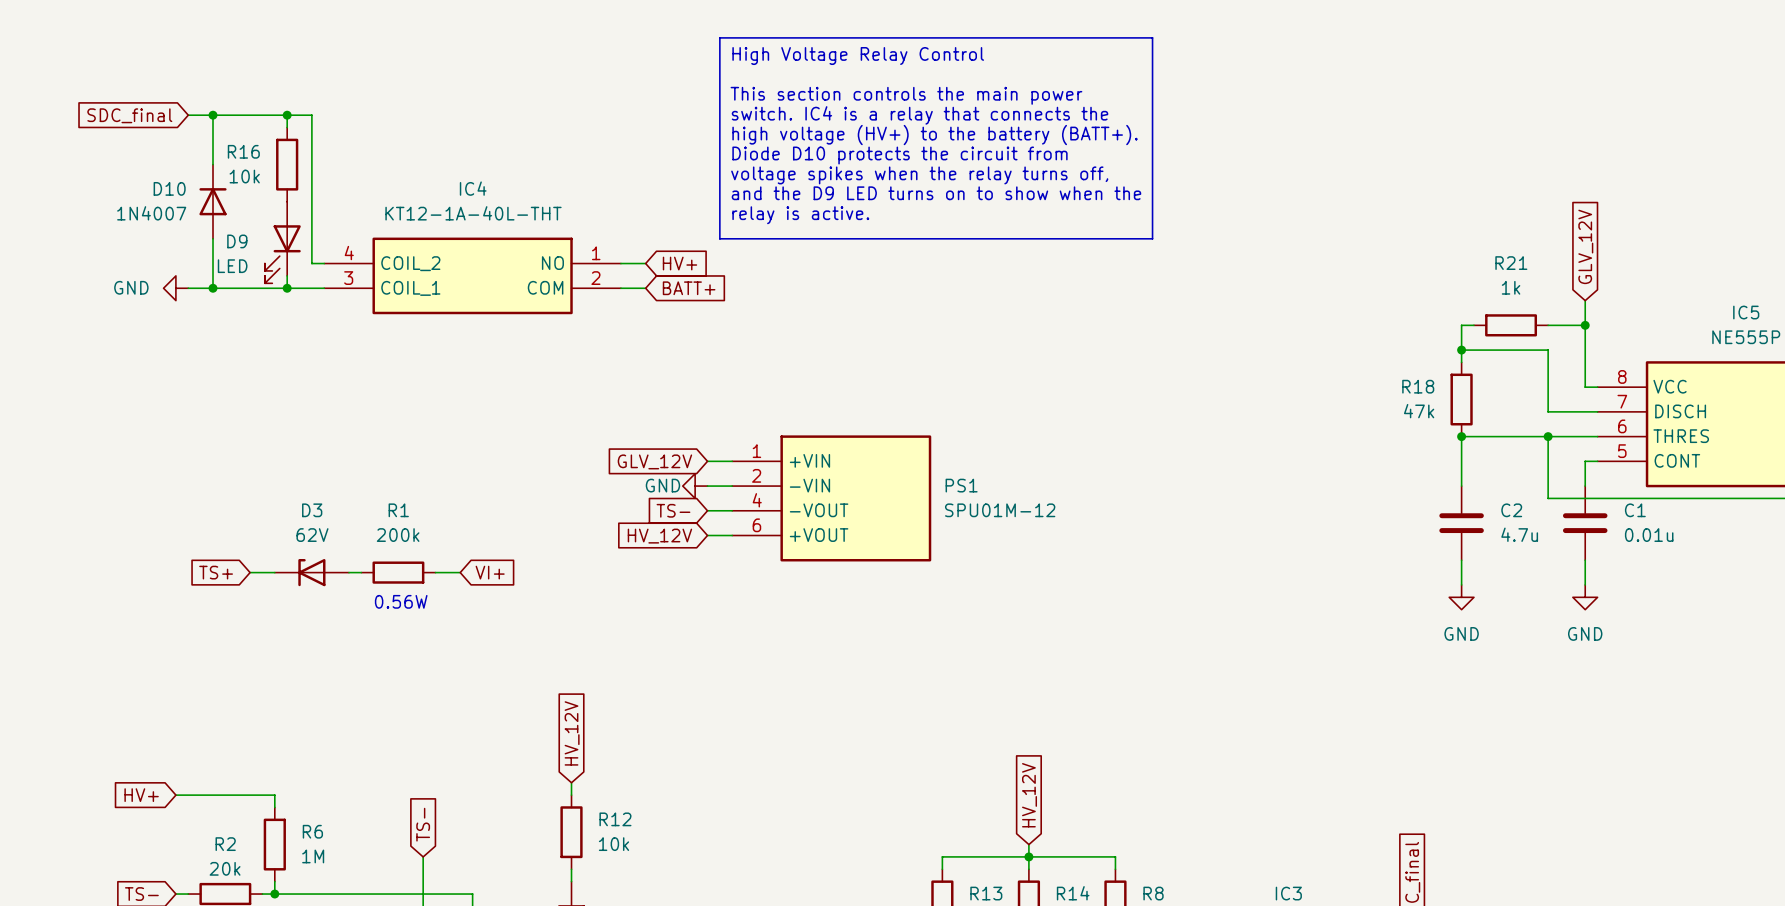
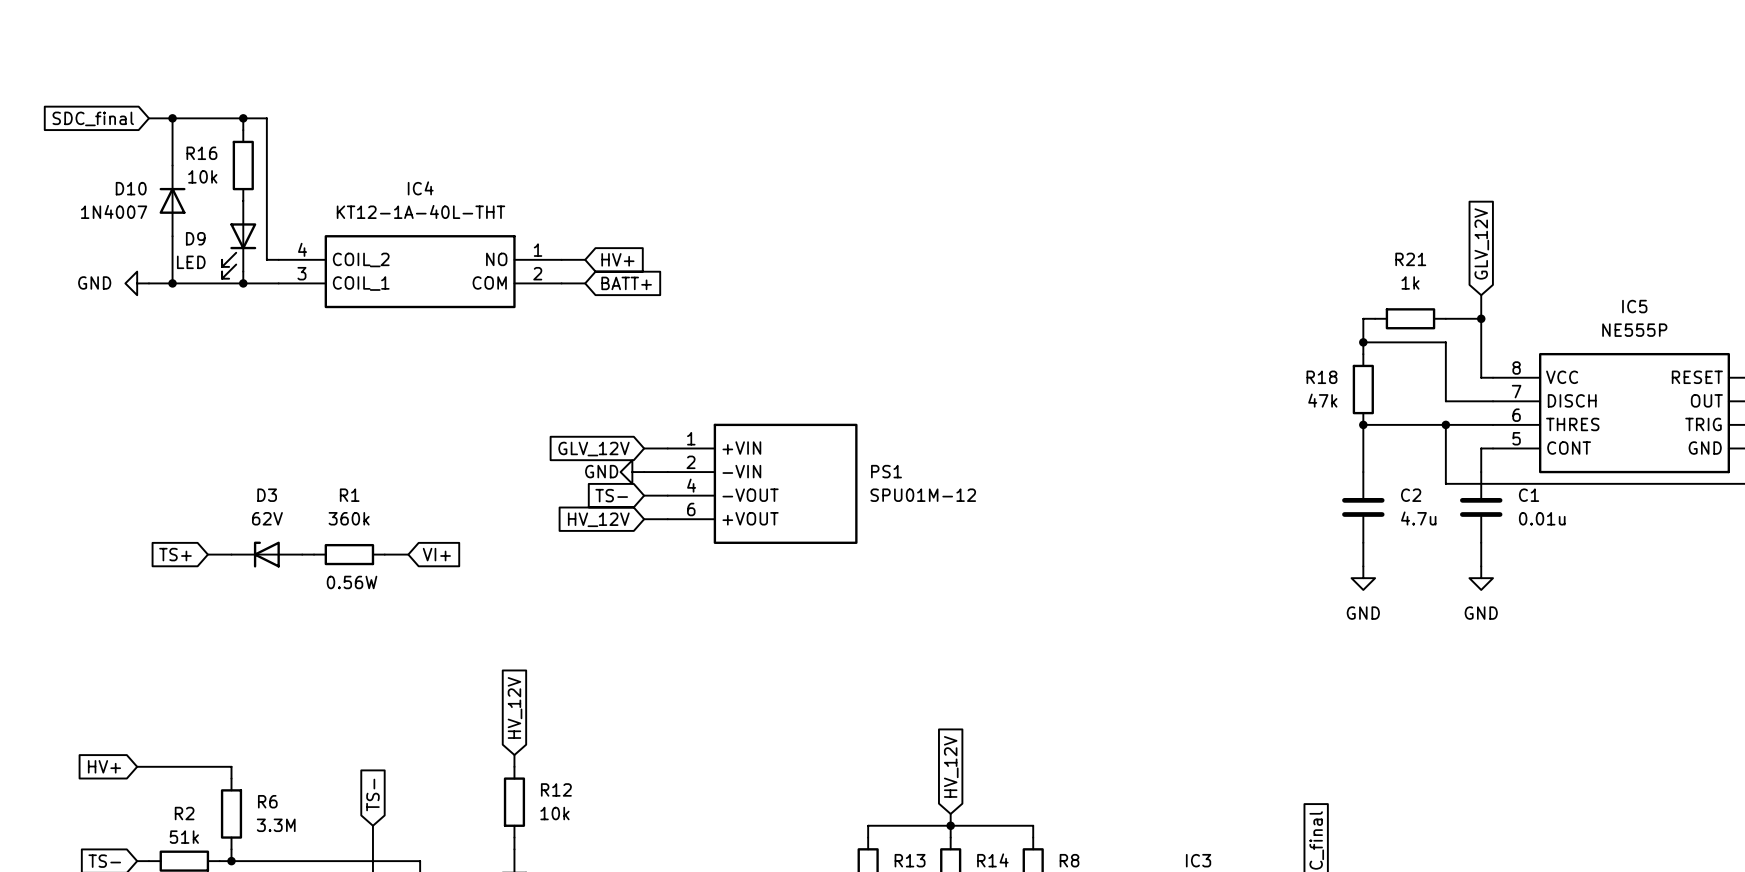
line: (719, 37) (1152, 37) (1152, 238) (719, 238) (719, 37) -> none
text: High Voltage Relay Control (858, 56) -> none
text: This section controls the main power (906, 95) -> none
text: switch. IC4 is a relay that connects the (919, 115) -> none
text: high voltage (HV+) to the battery (BATT+). (935, 135) -> none
text: Diode D10 protects the circuit from (899, 155) -> none
text: voltage spikes when the relay turns off, (919, 175) -> none
text: and the D9 LED turns on to show when the (936, 193) -> none
text: relay is active. (800, 215) -> none
R1 value: 200k (398, 535) -> 360k (349, 518)
R6 value: 1M (313, 856) -> 3.3M (276, 825)
R2 value: 20k (225, 868) -> 51k (184, 837)

